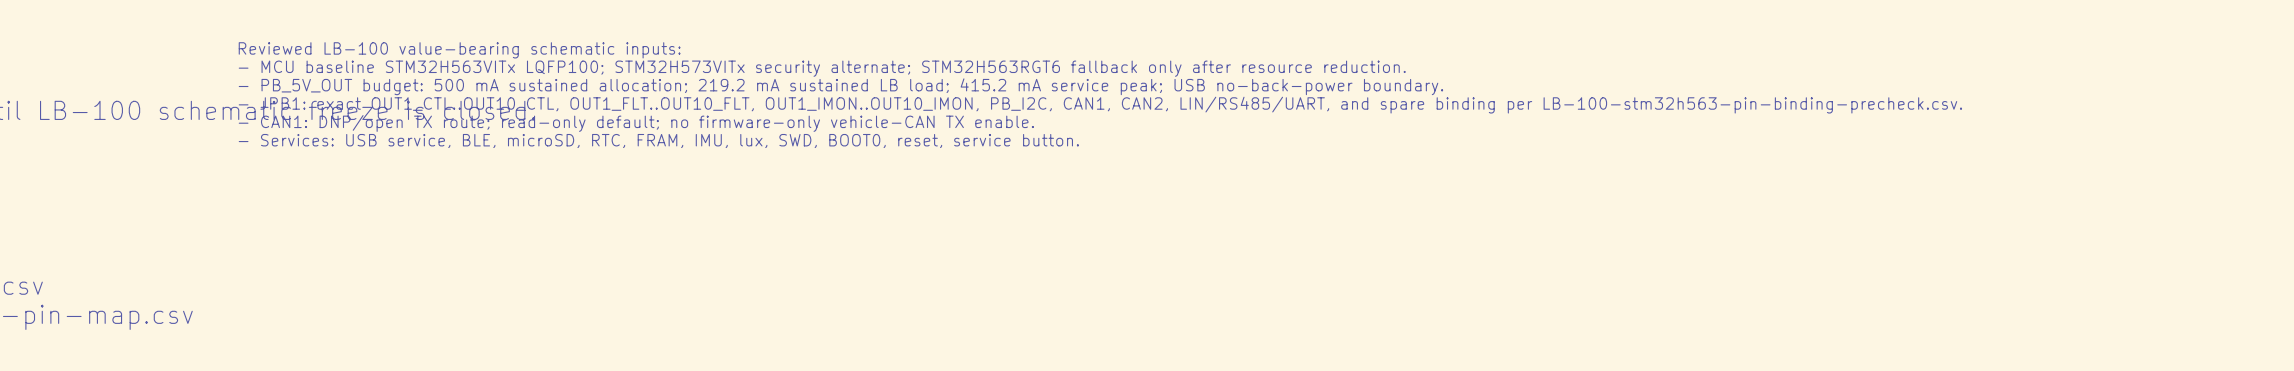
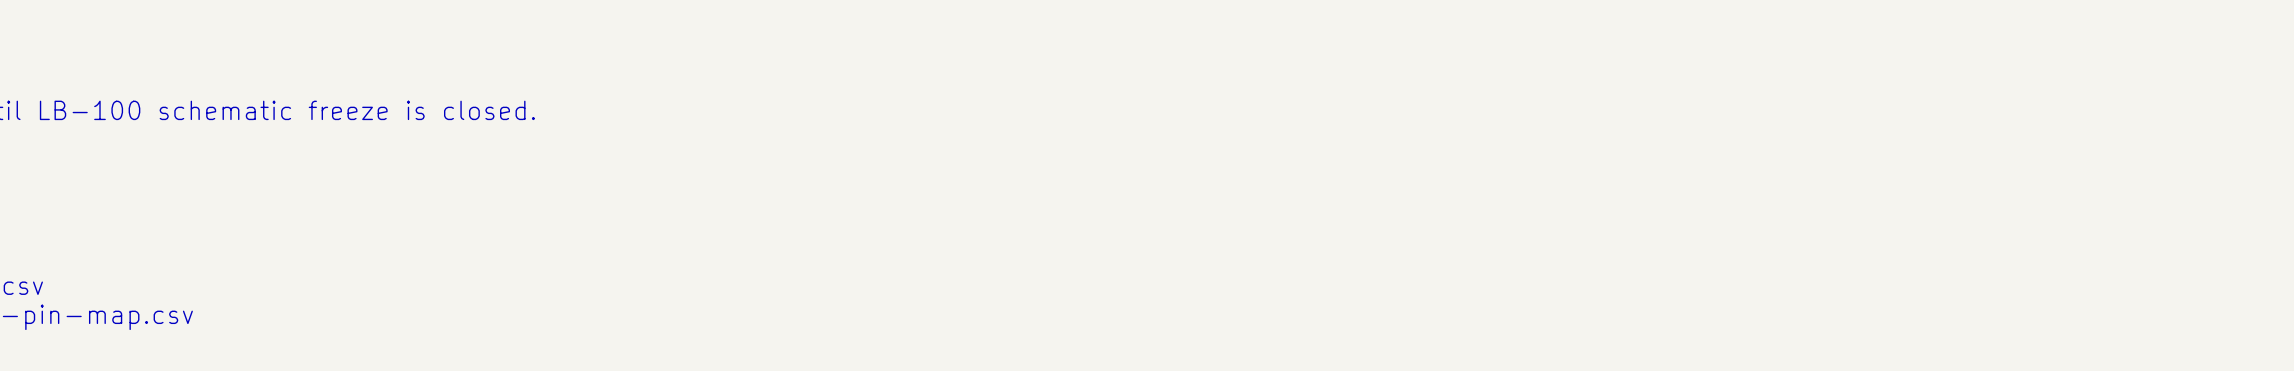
text: Reviewed LB-100 value-bearing schematic inputs: (459, 50) -> none
text: - MCU baseline STM32H563VITx LQFP100; STM32H573VITx security alternate; STM32H563RGT6 fallback only after resource reduction. (822, 68) -> none
text: - PB_5V_OUT budget: 500 mA sustained allocation; 219.2 mA sustained LB load; 415.2 mA service peak; USB no-back-power boundary. (840, 86) -> none
text: - JPB1: exact OUT1_CTL..OUT10_CTL, OUT1_FLT..OUT10_FLT, OUT1_IMON..OUT10_IMON, PB_I2C, CAN1, CAN2, LIN/RS485/UART, and spare binding per LB-100-stm32h563-pin-binding-precheck.csv. (1100, 105) -> none
text: - CAN1: DNP/open TX route; read-only default; no firmware-only vehicle-CAN TX enable. (636, 123) -> none
text: - Services: USB service, BLE, microSD, RTC, FRAM, IMU, lux, SWD, BOOT0, reset, service button. (658, 141) -> none

